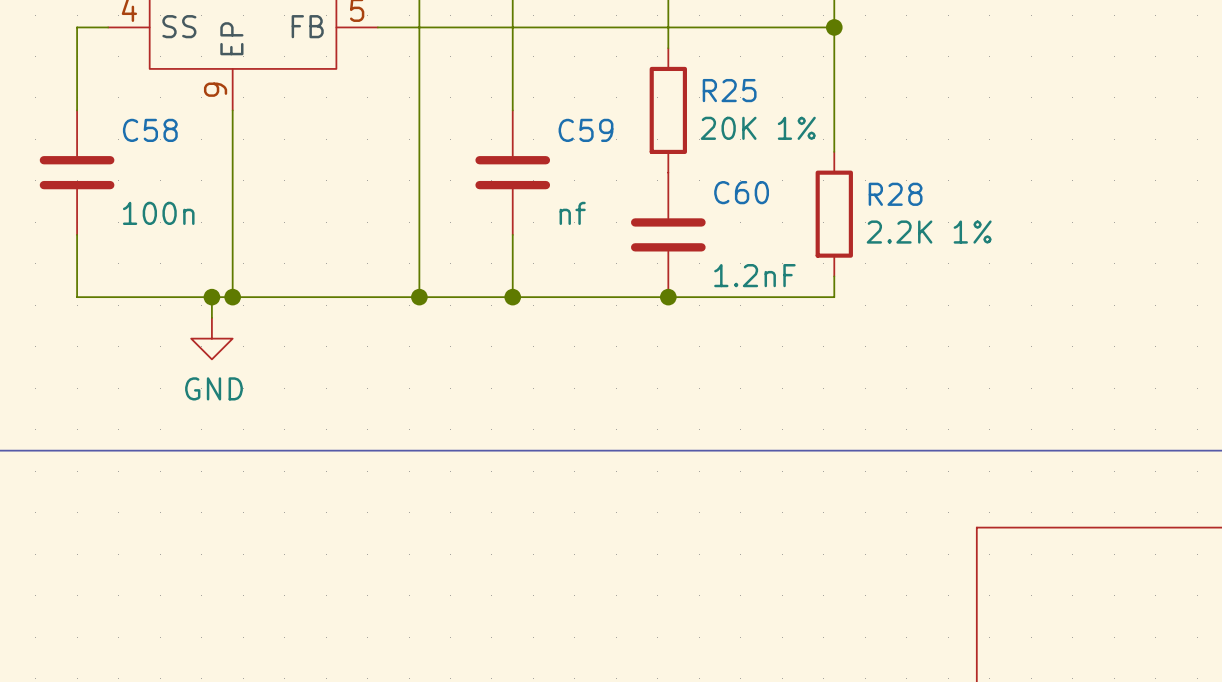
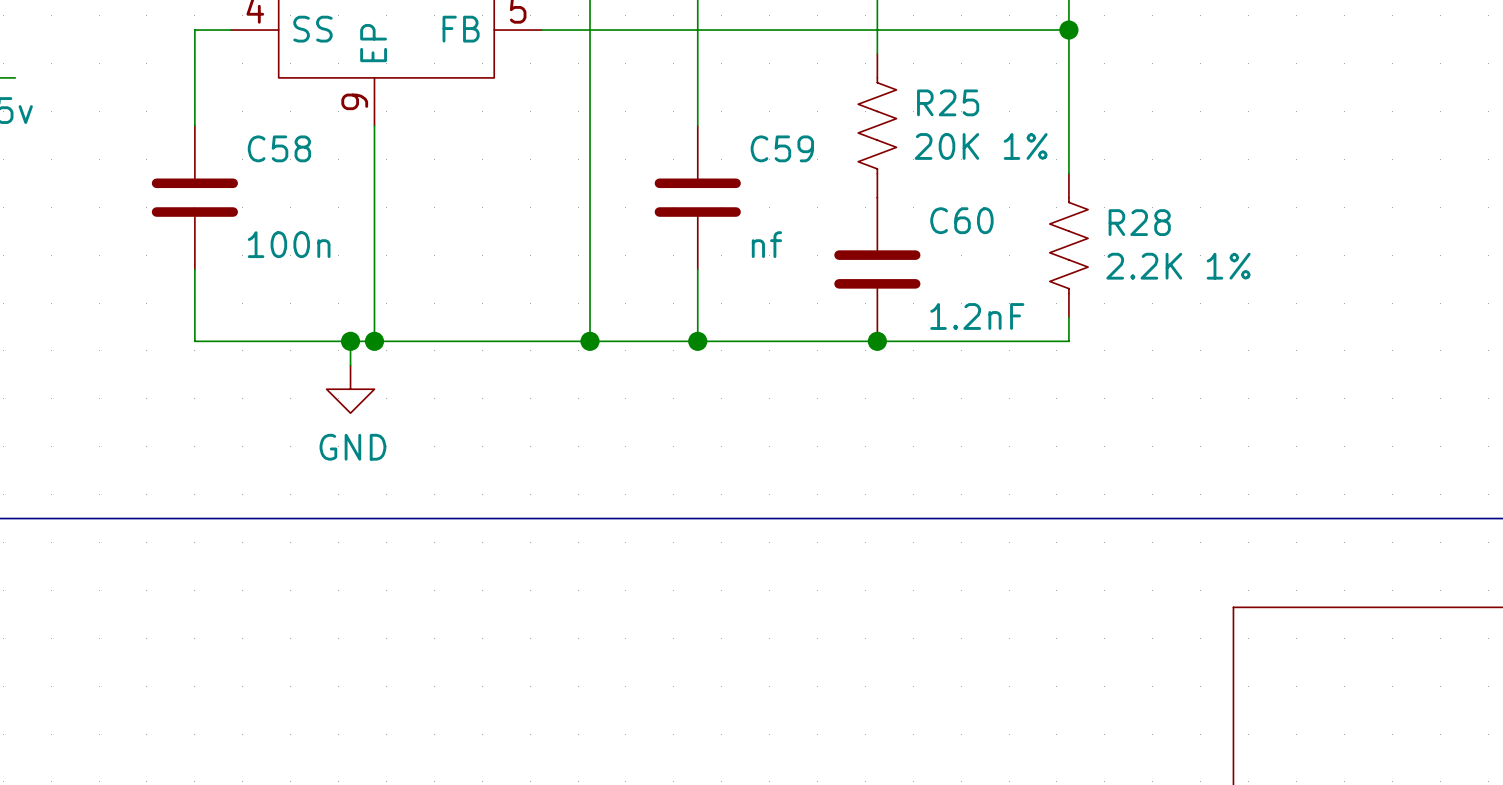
R25 symbol: [649, 48, 687, 173] -> [858, 53, 897, 198]
R28 symbol: [815, 151, 853, 277] -> [1049, 173, 1089, 318]

